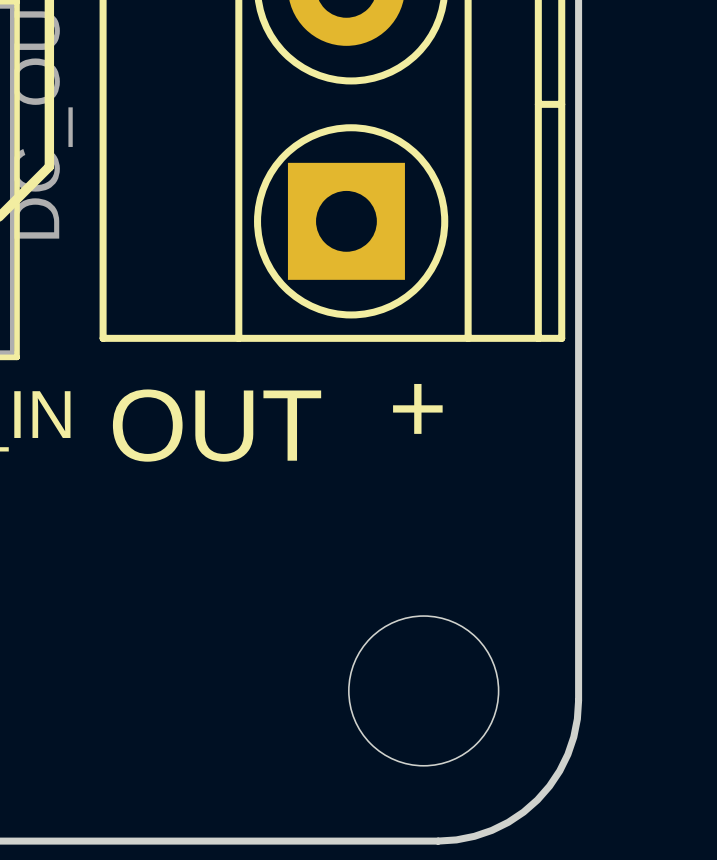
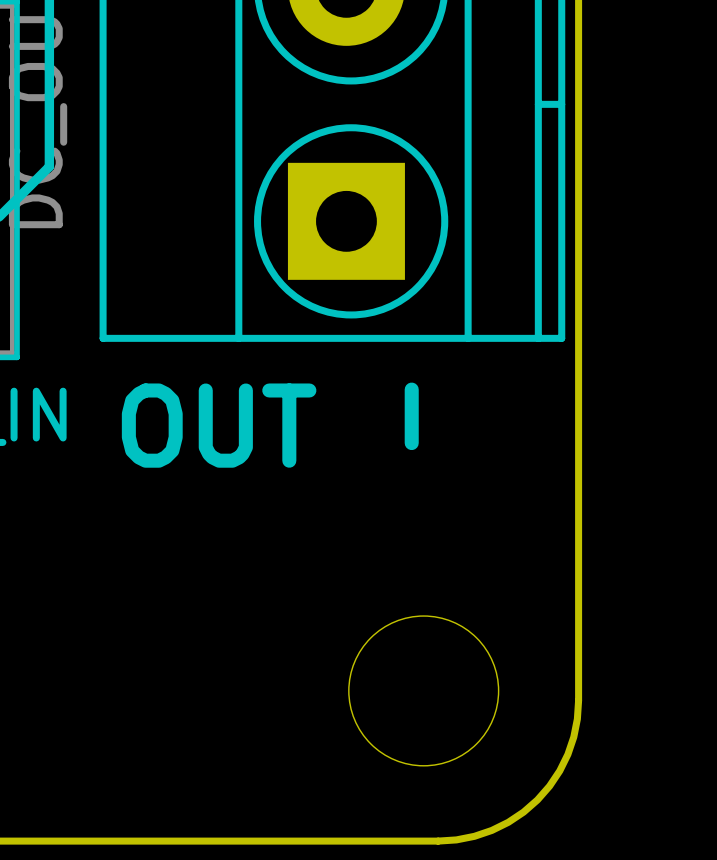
text: + (417, 408) -> - (411, 416)

